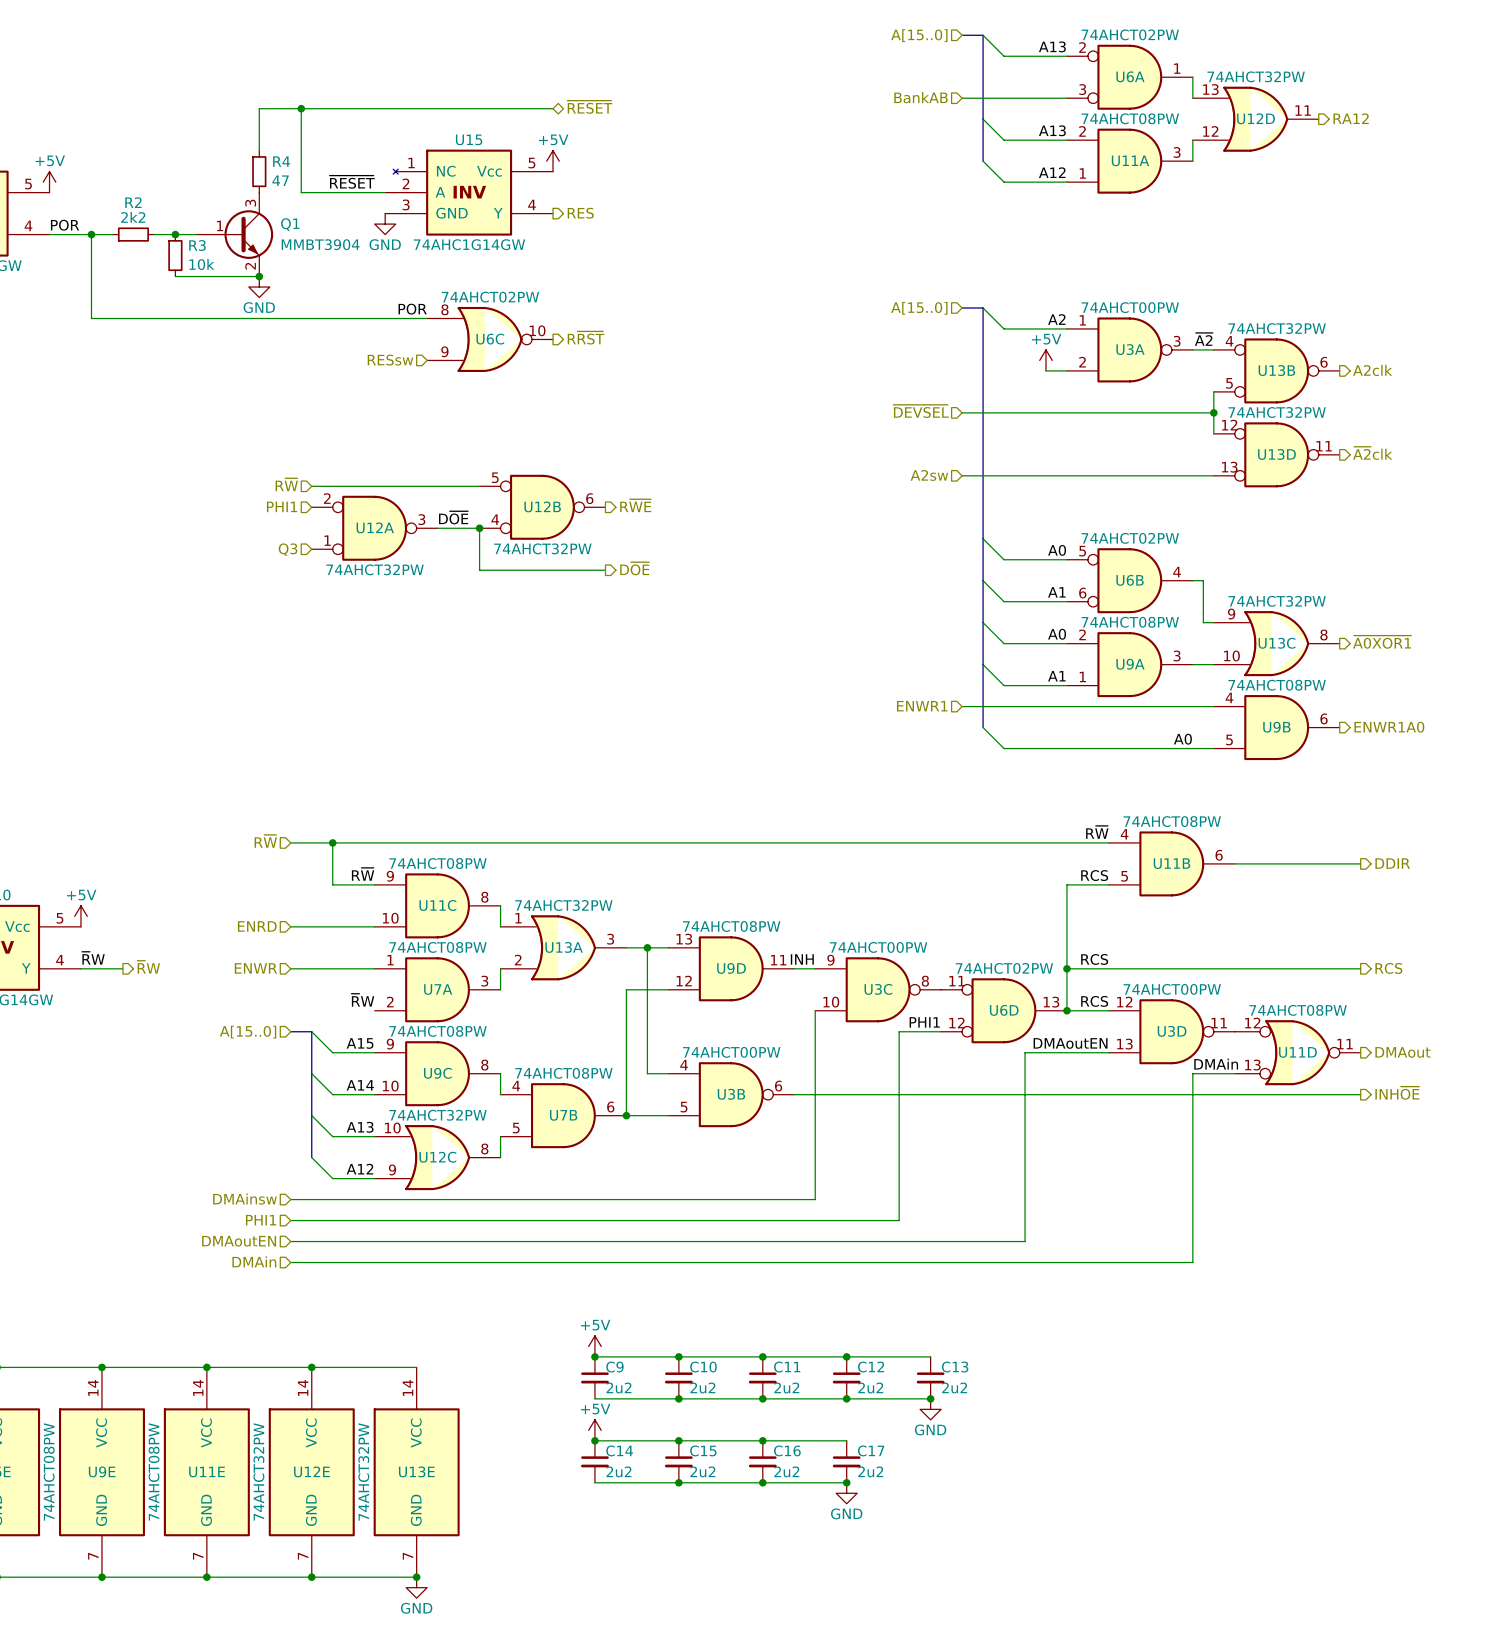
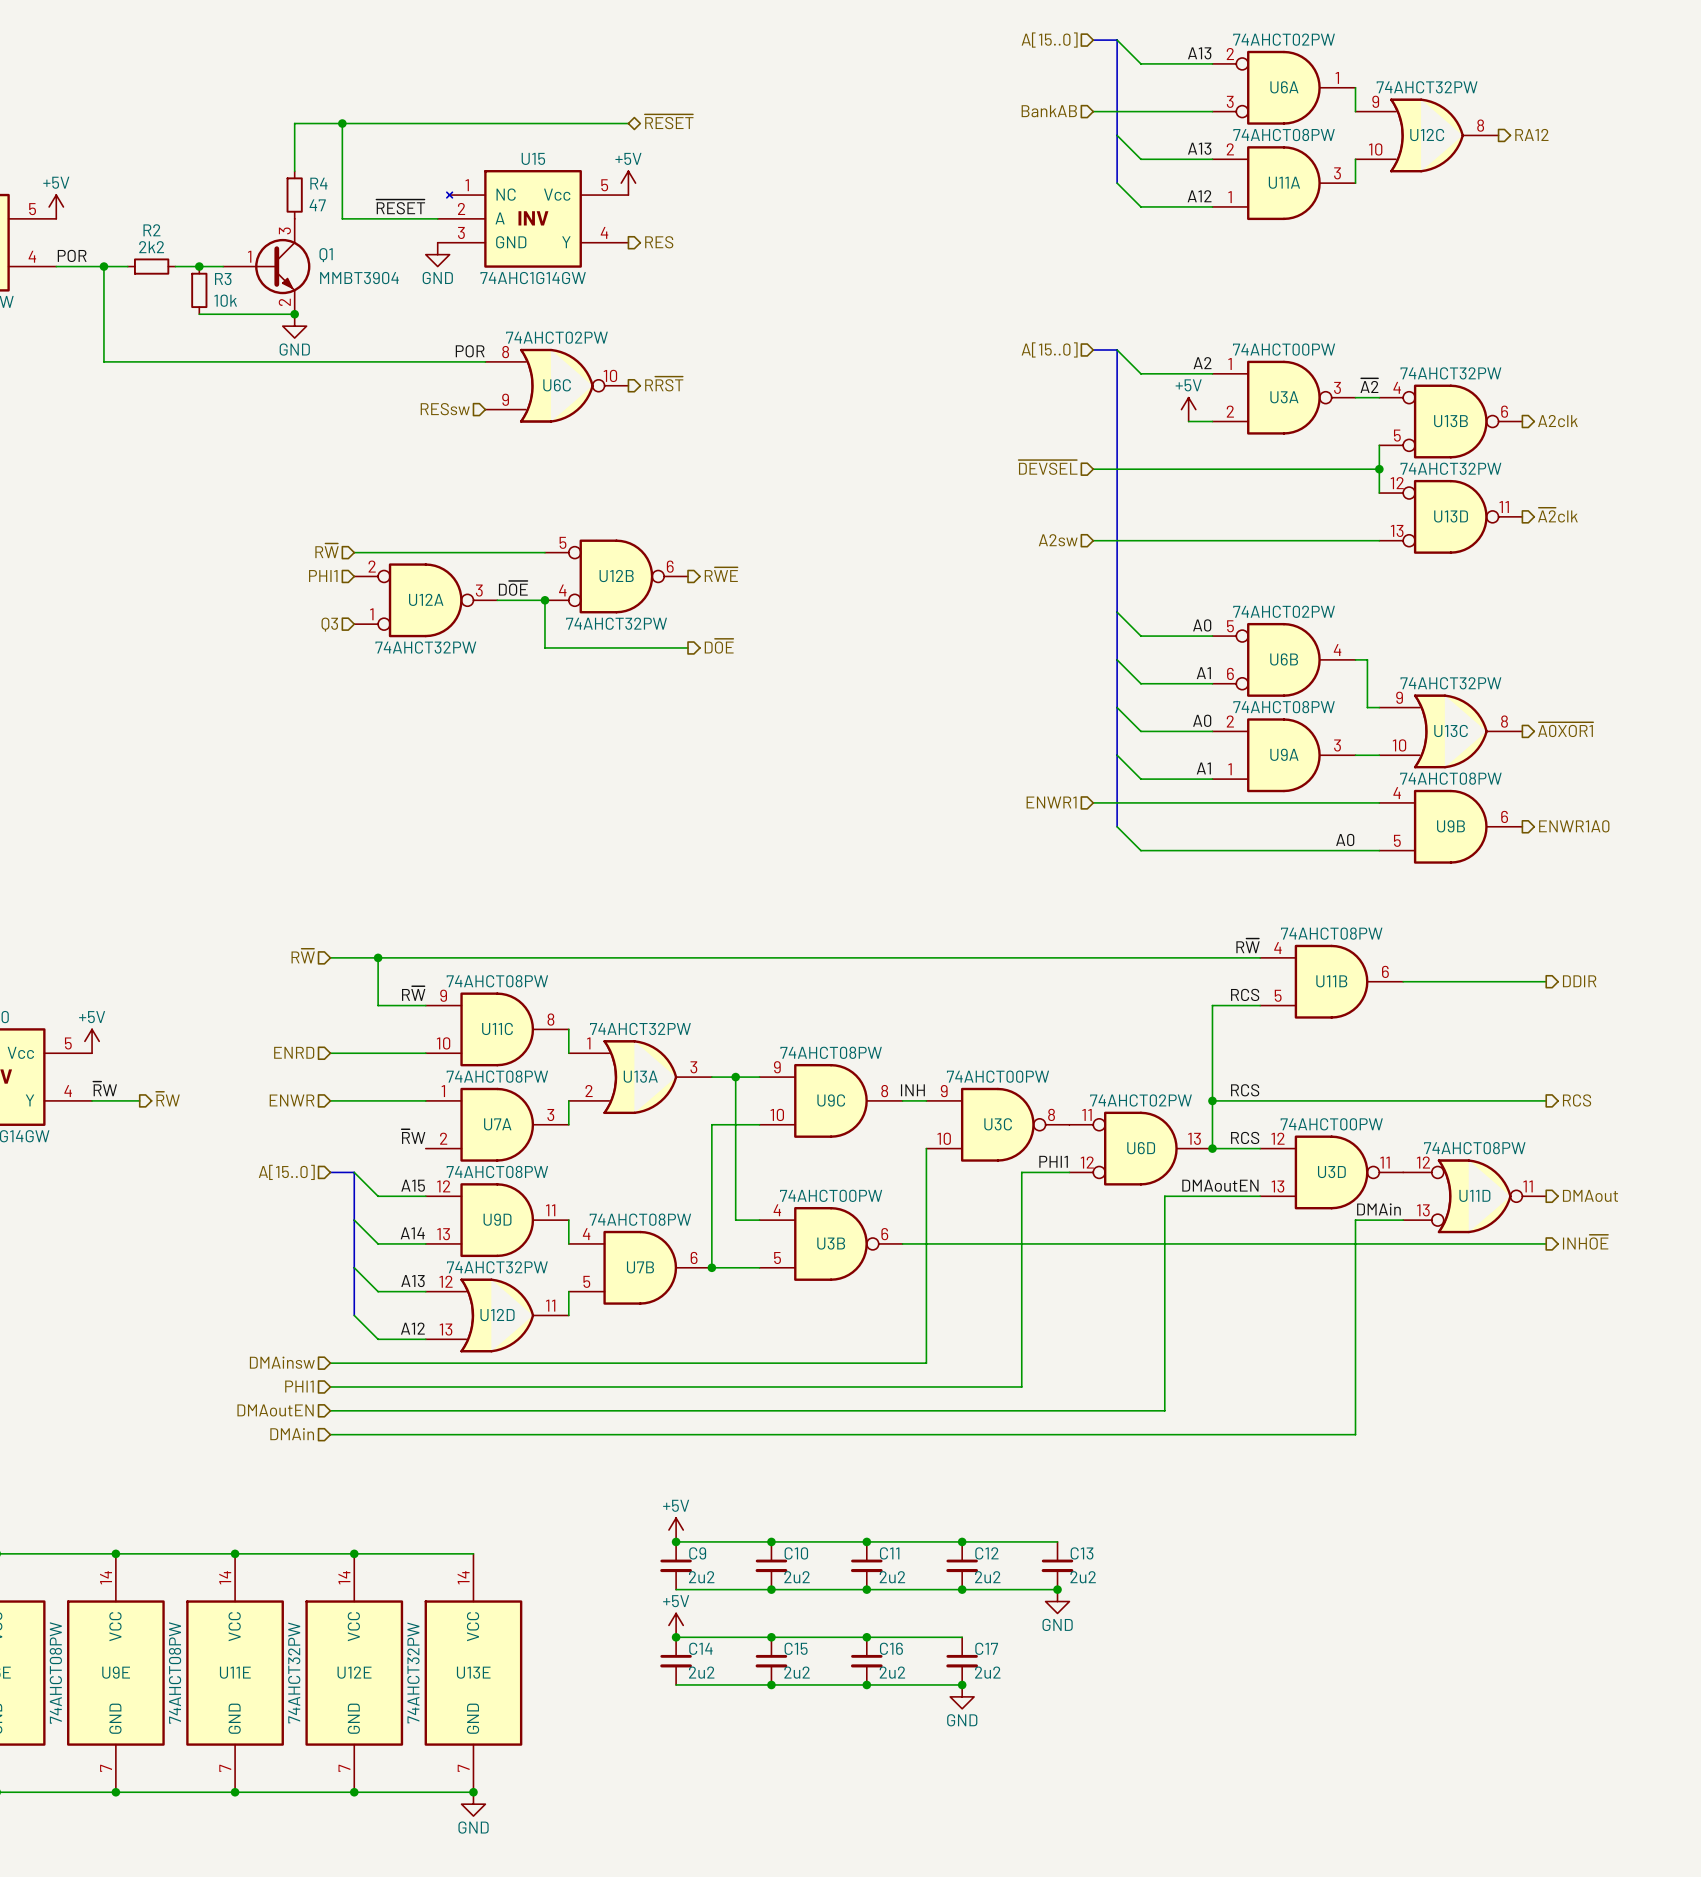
U12D flip: as is (1255, 119) -> up-down (497, 1315)
U12D position: (1255, 119) -> (497, 1315)
U9D flip: as is (731, 968) -> up-down (497, 1220)
U9D position: (731, 968) -> (497, 1220)
U9C position: (437, 1073) -> (831, 1100)
U12C flip: as is (437, 1157) -> up-down (1427, 135)
U12C position: (437, 1157) -> (1427, 135)

